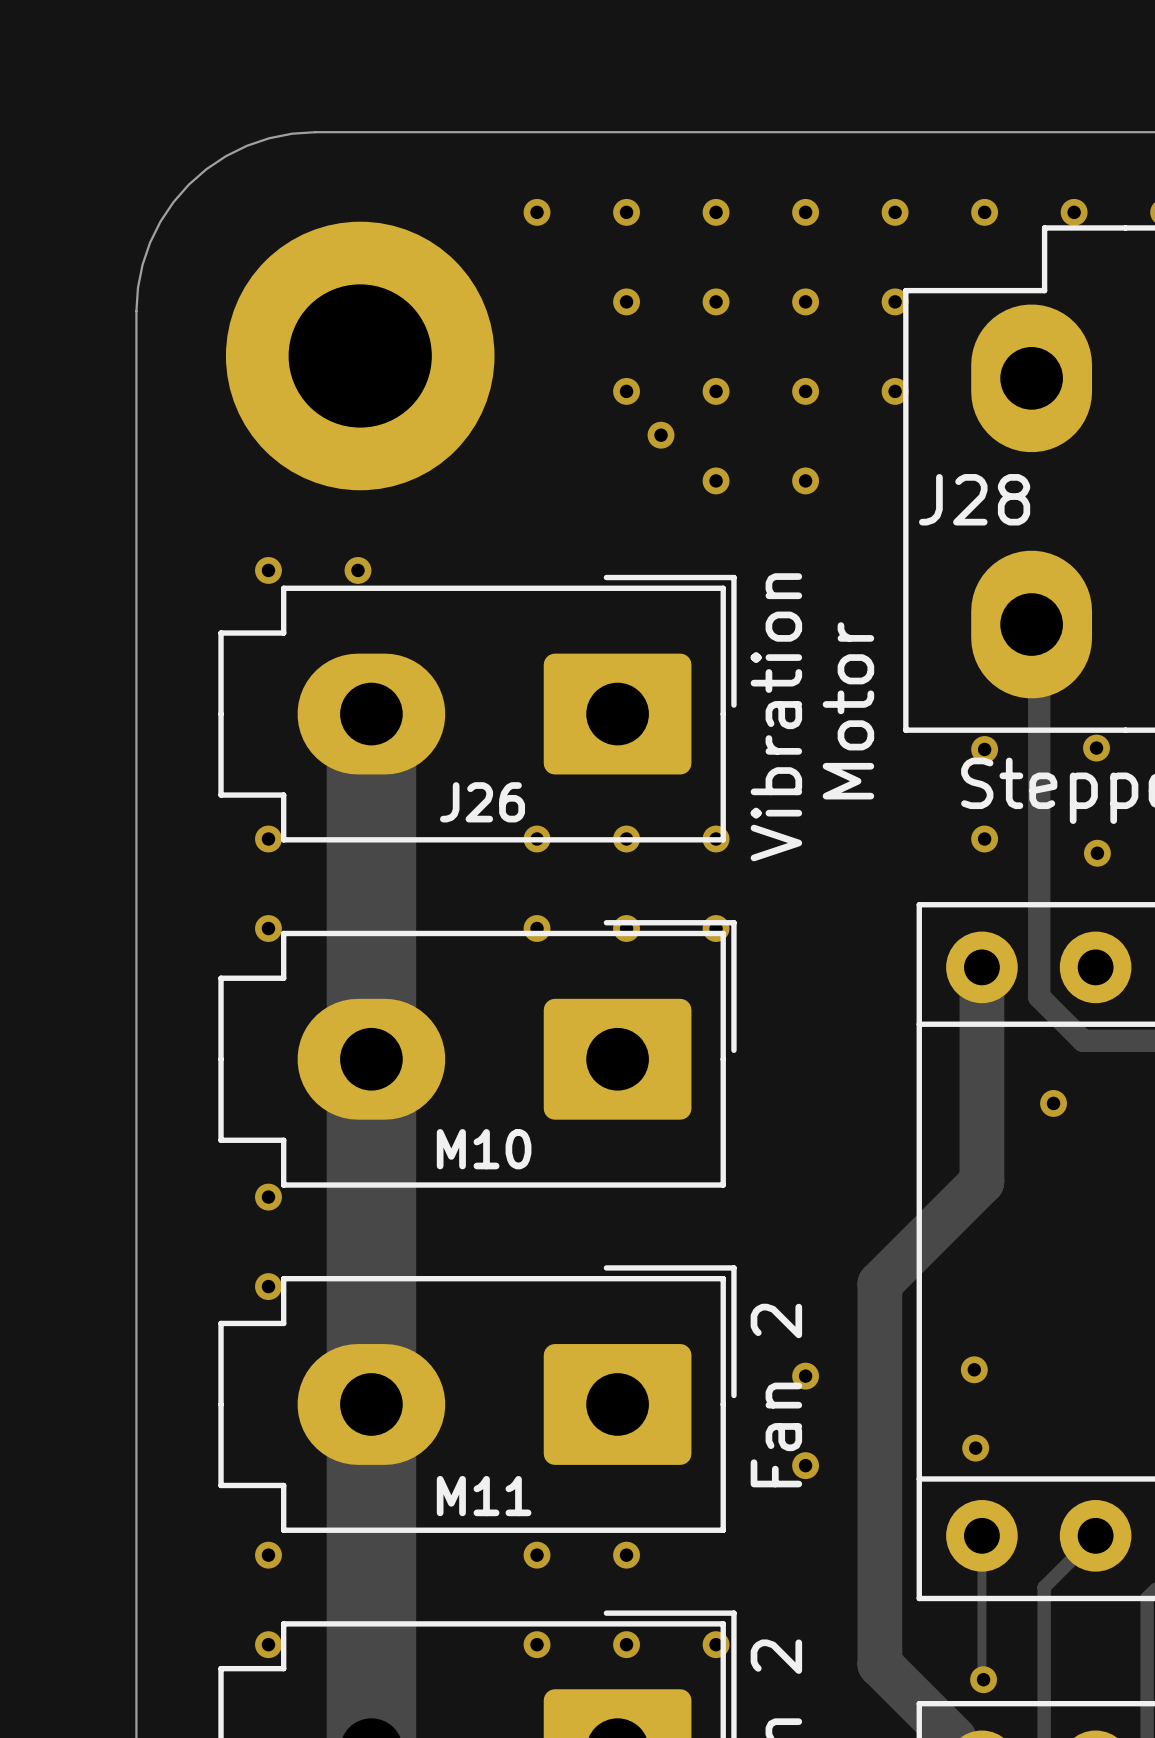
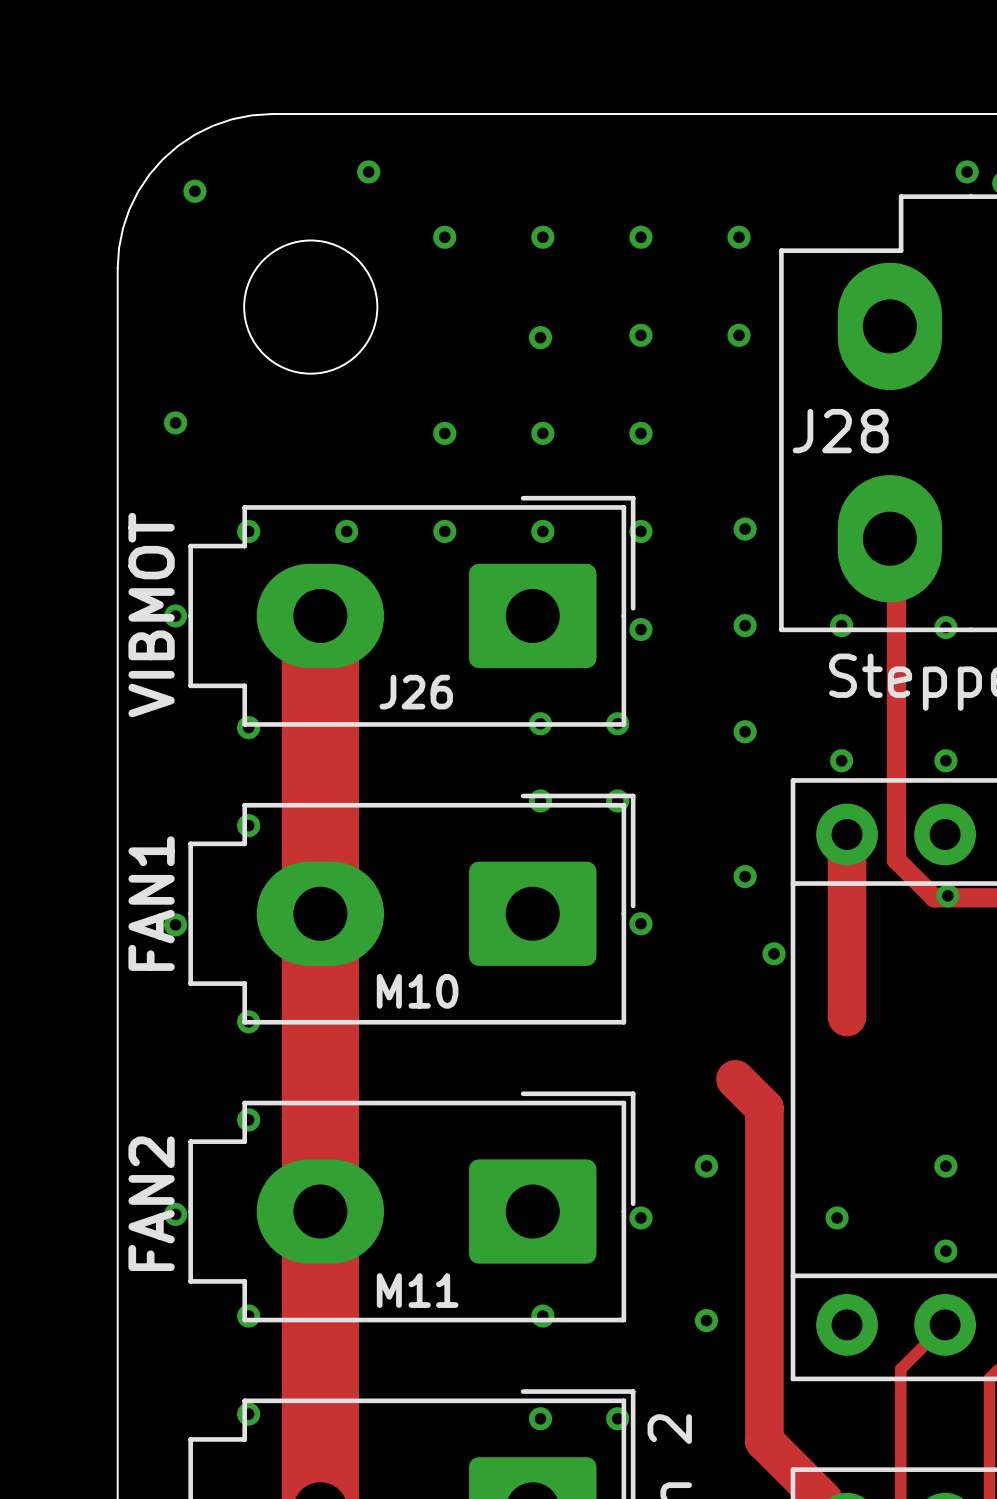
via: none -> (368, 171)
via: (537, 212) -> none
via: (626, 212) -> none
via: (716, 212) -> none
via: (805, 212) -> none
via: (895, 212) -> none
via: (984, 212) -> none
via position: (1074, 212) -> (967, 171)
via: none -> (194, 191)
via: none -> (444, 237)
via: none -> (640, 237)
via: none -> (739, 237)
drawing: none -> [243, 239, 379, 375]
via position: (626, 301) -> (542, 237)
via: (716, 301) -> none
via: (805, 301) -> none
via: (895, 301) -> none
part: (360, 355) -> none
via: none -> (739, 335)
via position: (716, 391) -> (640, 335)
via: (805, 391) -> none
via: (895, 391) -> none
via: (661, 435) -> none
via: (716, 480) -> none
via: (805, 480) -> none
via: none -> (175, 422)
via: none -> (444, 433)
via: none -> (542, 433)
via: none -> (640, 433)
via: (268, 570) -> none
via: (357, 570) -> none
via: none -> (745, 529)
via: none -> (248, 531)
via: none -> (346, 531)
via: none -> (444, 531)
via: none -> (542, 531)
via: none -> (640, 531)
text: Motor (848, 710) -> none
text: none -> VIBMOT (151, 615)
via: none -> (175, 615)
text: Vibration (776, 717) -> none
via: none -> (745, 625)
via: none -> (640, 629)
via position: (1096, 748) -> (945, 627)
via position: (984, 749) -> (841, 625)
via position: (268, 839) -> (248, 727)
via: (537, 839) -> none
via position: (984, 839) -> (841, 760)
via: none -> (745, 731)
via position: (1097, 853) -> (945, 760)
via position: (268, 928) -> (248, 825)
via: (537, 928) -> none
via: none -> (745, 876)
via: none -> (947, 895)
text: none -> FAN1 (151, 903)
via: none -> (640, 923)
via: none -> (175, 924)
via: (1053, 1103) -> none
via: none -> (774, 953)
track: (981, 1179) (981, 1181) (879, 1283) (879, 1664) (886, 1670) -> (735, 1079) (764, 1108) (764, 1441)
via position: (268, 1197) -> (248, 1021)
via position: (268, 1286) -> (248, 1119)
via: none -> (945, 1166)
via: (974, 1369) -> none
via position: (805, 1376) -> (706, 1166)
text: none -> FAN2 (151, 1203)
text: Fan 2 (776, 1395) -> none
via: none -> (175, 1214)
via: none -> (640, 1217)
via: none -> (837, 1217)
via: (975, 1448) -> none
via: none -> (945, 1251)
via: (805, 1465) -> none
via: none -> (706, 1320)
track: (981, 1535) (981, 1678) (983, 1679) -> none
via position: (268, 1555) -> (248, 1316)
via: (537, 1555) -> none
via position: (626, 1555) -> (542, 1316)
via position: (268, 1644) -> (248, 1414)
via: (537, 1644) -> none
via: (983, 1679) -> none

